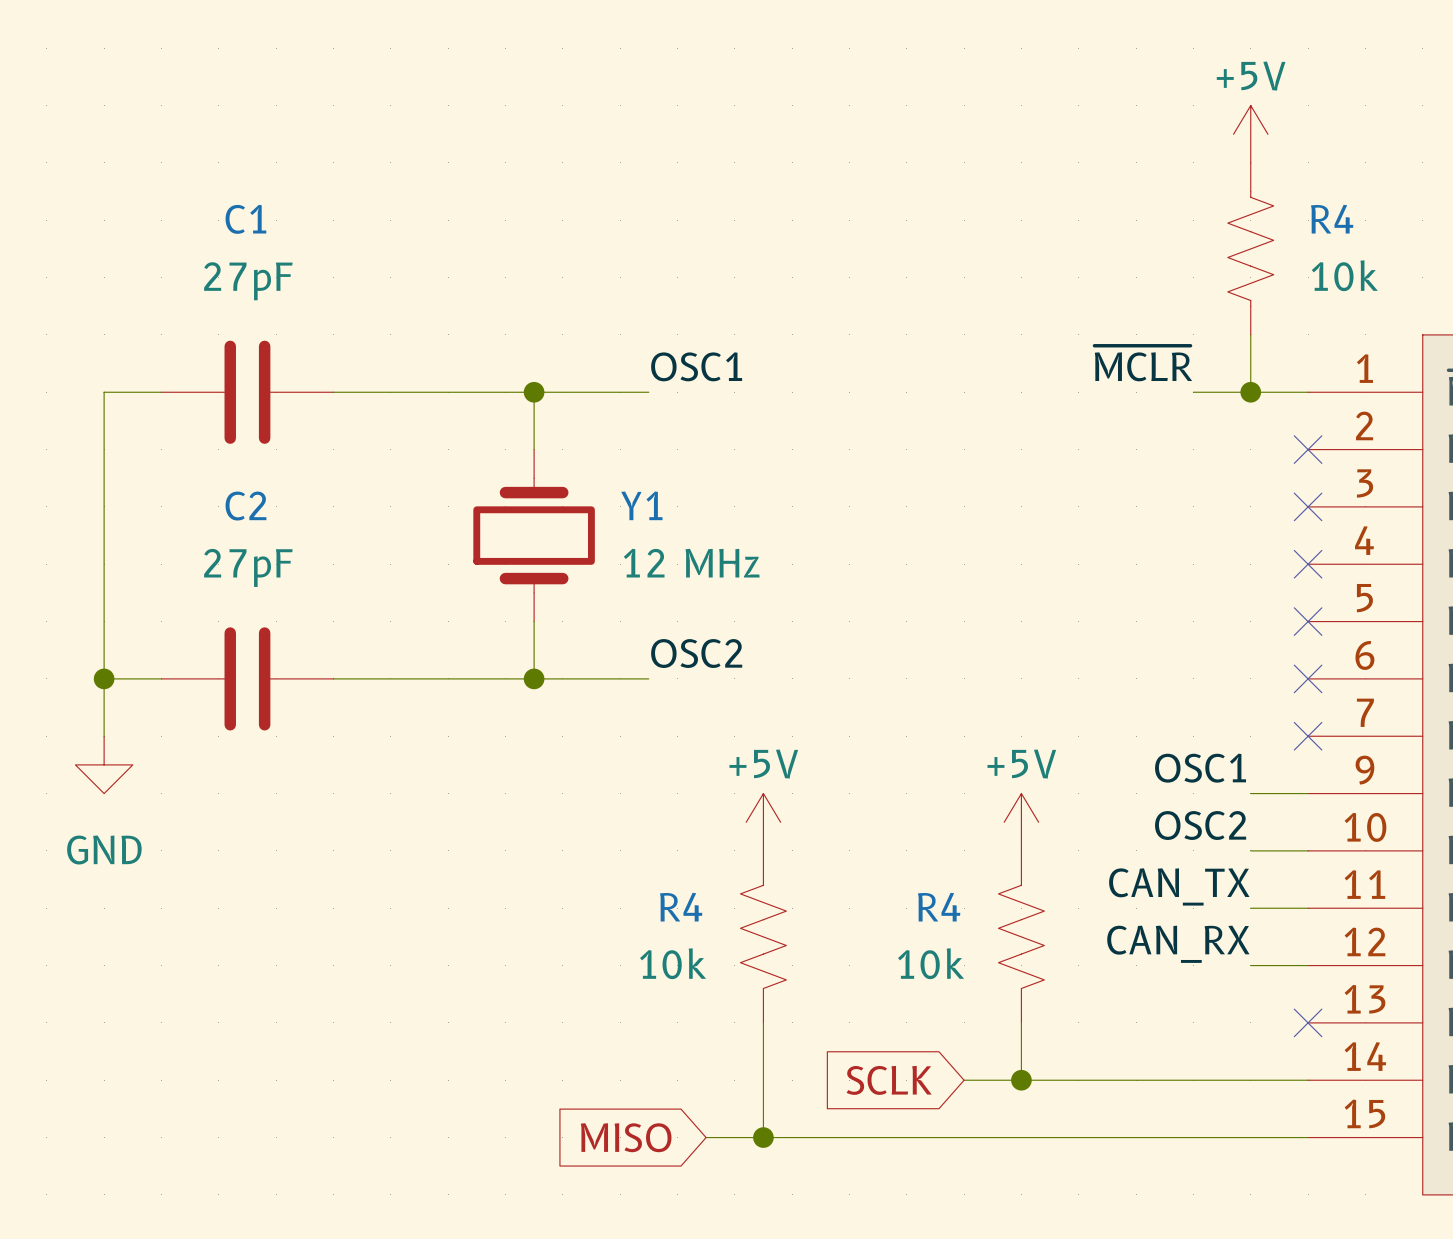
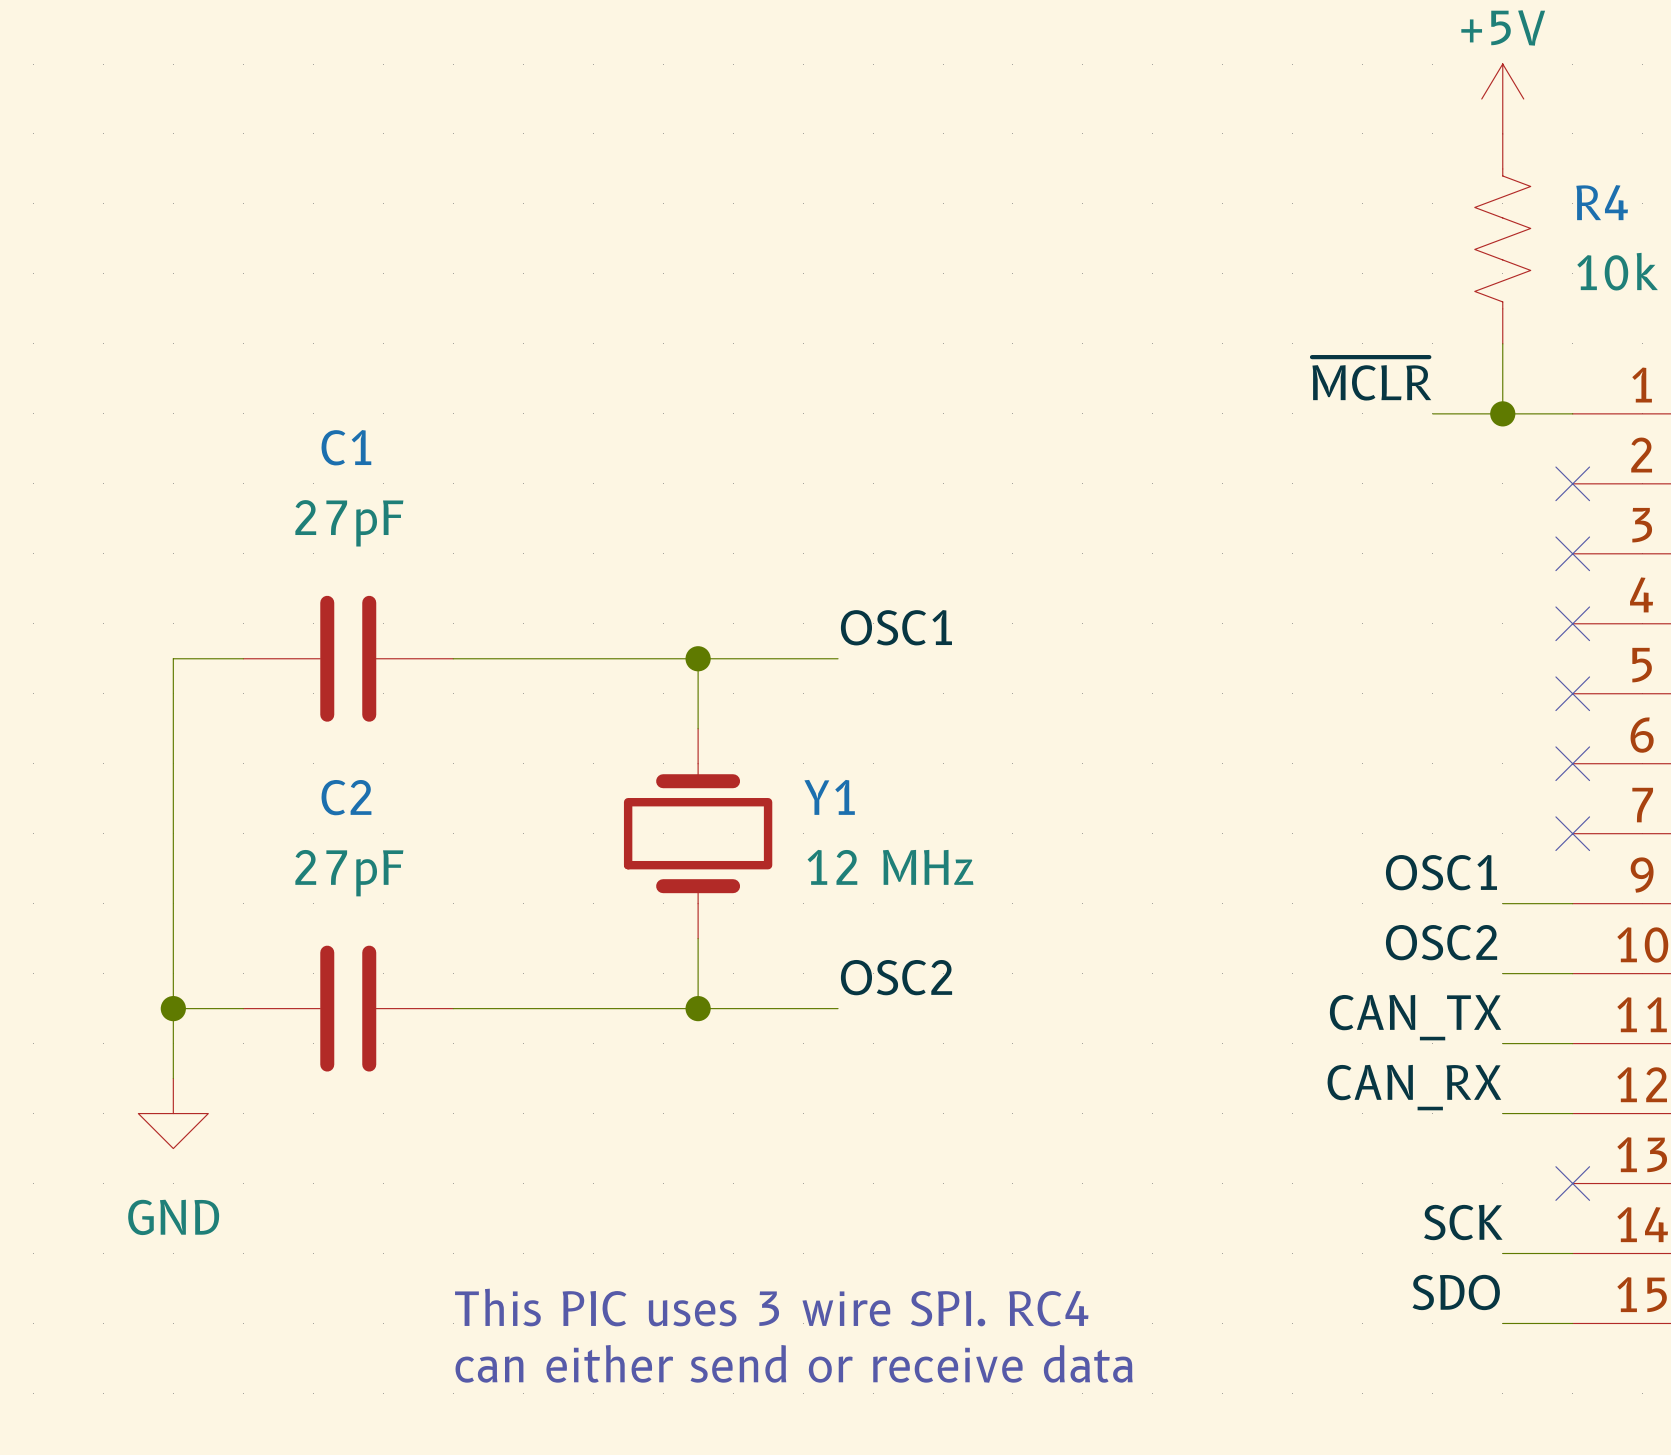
label position: OSC1 (696, 366) -> OSC1 (896, 627)
wire: (161, 392) (104, 392) (104, 736) -> (243, 658) (173, 658) (173, 1078)
C1 position: (247, 392) -> (348, 658)
wire: (333, 392) (648, 392) -> (453, 658) (838, 658)
wire: (534, 392) (534, 449) -> (698, 658) (698, 728)
junction: (534, 392) -> none
Y1 position: (534, 535) -> (698, 833)
wire: (534, 621) (534, 678) -> (698, 938) (698, 1008)
label position: OSC2 (696, 653) -> OSC2 (896, 977)
wire: (104, 678) (161, 678) -> (173, 1008) (243, 1008)
junction: (104, 678) -> none
C2 position: (247, 678) -> (348, 1008)
wire: (333, 678) (648, 678) -> (453, 1008) (838, 1008)
junction position: (534, 678) -> (698, 658)
power symbol position: GND (104, 764) -> GND (173, 1113)
power symbol: +5V (763, 822) -> none
power symbol: +5V (1021, 822) -> none
junction: none -> (173, 1008)
junction: none -> (698, 1008)
R4: 10k (763, 936) -> none
R4: 10k (1021, 936) -> none
wire: (763, 1022) (763, 1137) -> none
wire: (1021, 1022) (1021, 1080) -> none
label: none -> SCK (1463, 1222)
global label: SCLK (889, 1080) -> none
wire: (964, 1080) (1250, 1080) -> none
junction: (1021, 1080) -> none
label: none -> SDO (1456, 1292)
text: none -> This PIC uses 3 wire SPI. RC4 (771, 1307)
global label: MISO (626, 1137) -> none
wire: (706, 1137) (1250, 1137) -> none
junction: (763, 1137) -> none
text: none -> can either send or receive data (794, 1363)

